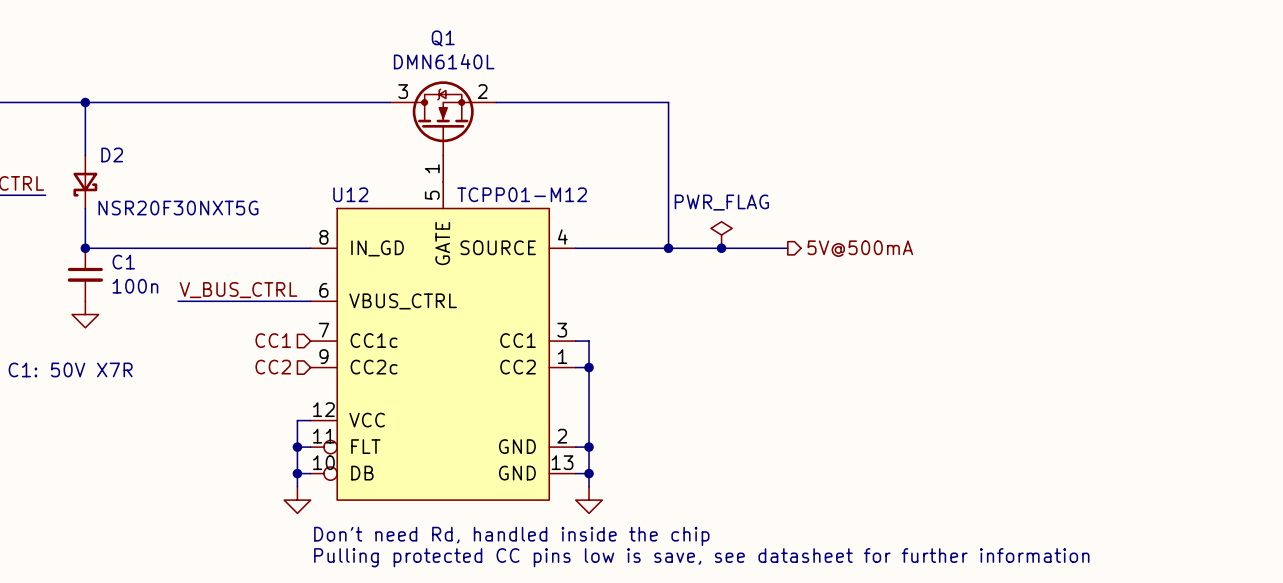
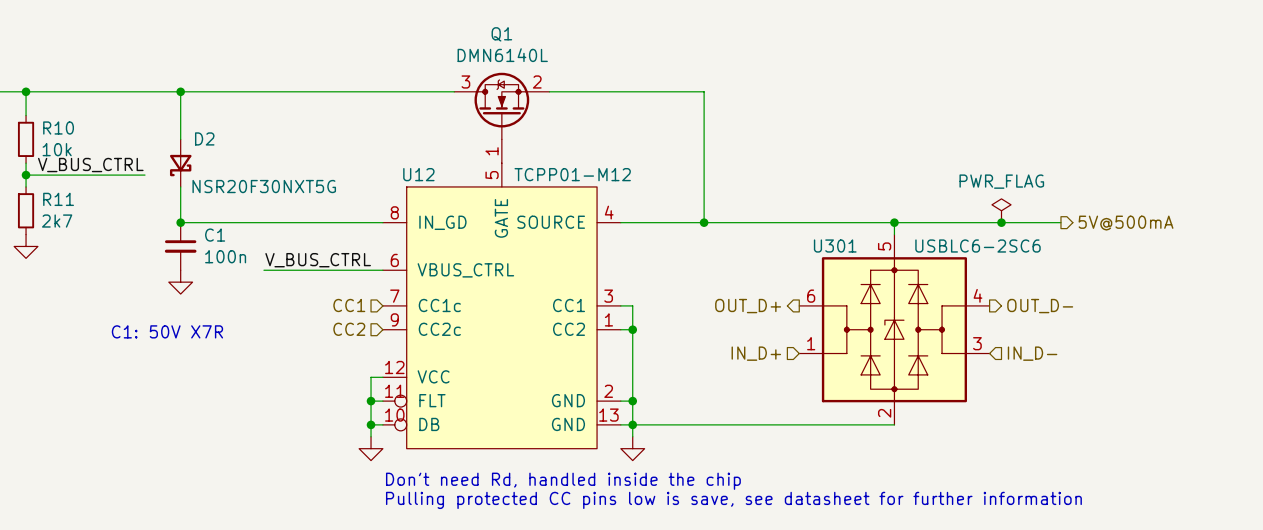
power symbol: PWR_FLAG (721, 235) -> none
power symbol: none -> PWR_FLAG (1001, 210)
junction: (721, 248) -> none
wire: none -> (811, 222) (1060, 222)
hierarchical label: 5V@500mA (860, 248) -> none
wire: none -> (894, 222) (894, 234)
junction: none -> (894, 222)
junction: none -> (1001, 222)
hierarchical label: none -> 5V@500mA (1126, 223)
hierarchical label: none -> OUT_D+ (748, 306)
hierarchical label: none -> OUT_D- (1040, 306)
U301: none -> USBLC6-2SC6 (894, 329)
hierarchical label: none -> IN_D+ (756, 353)
hierarchical label: none -> IN_D- (1032, 353)
wire: none -> (632, 424) (894, 424)

